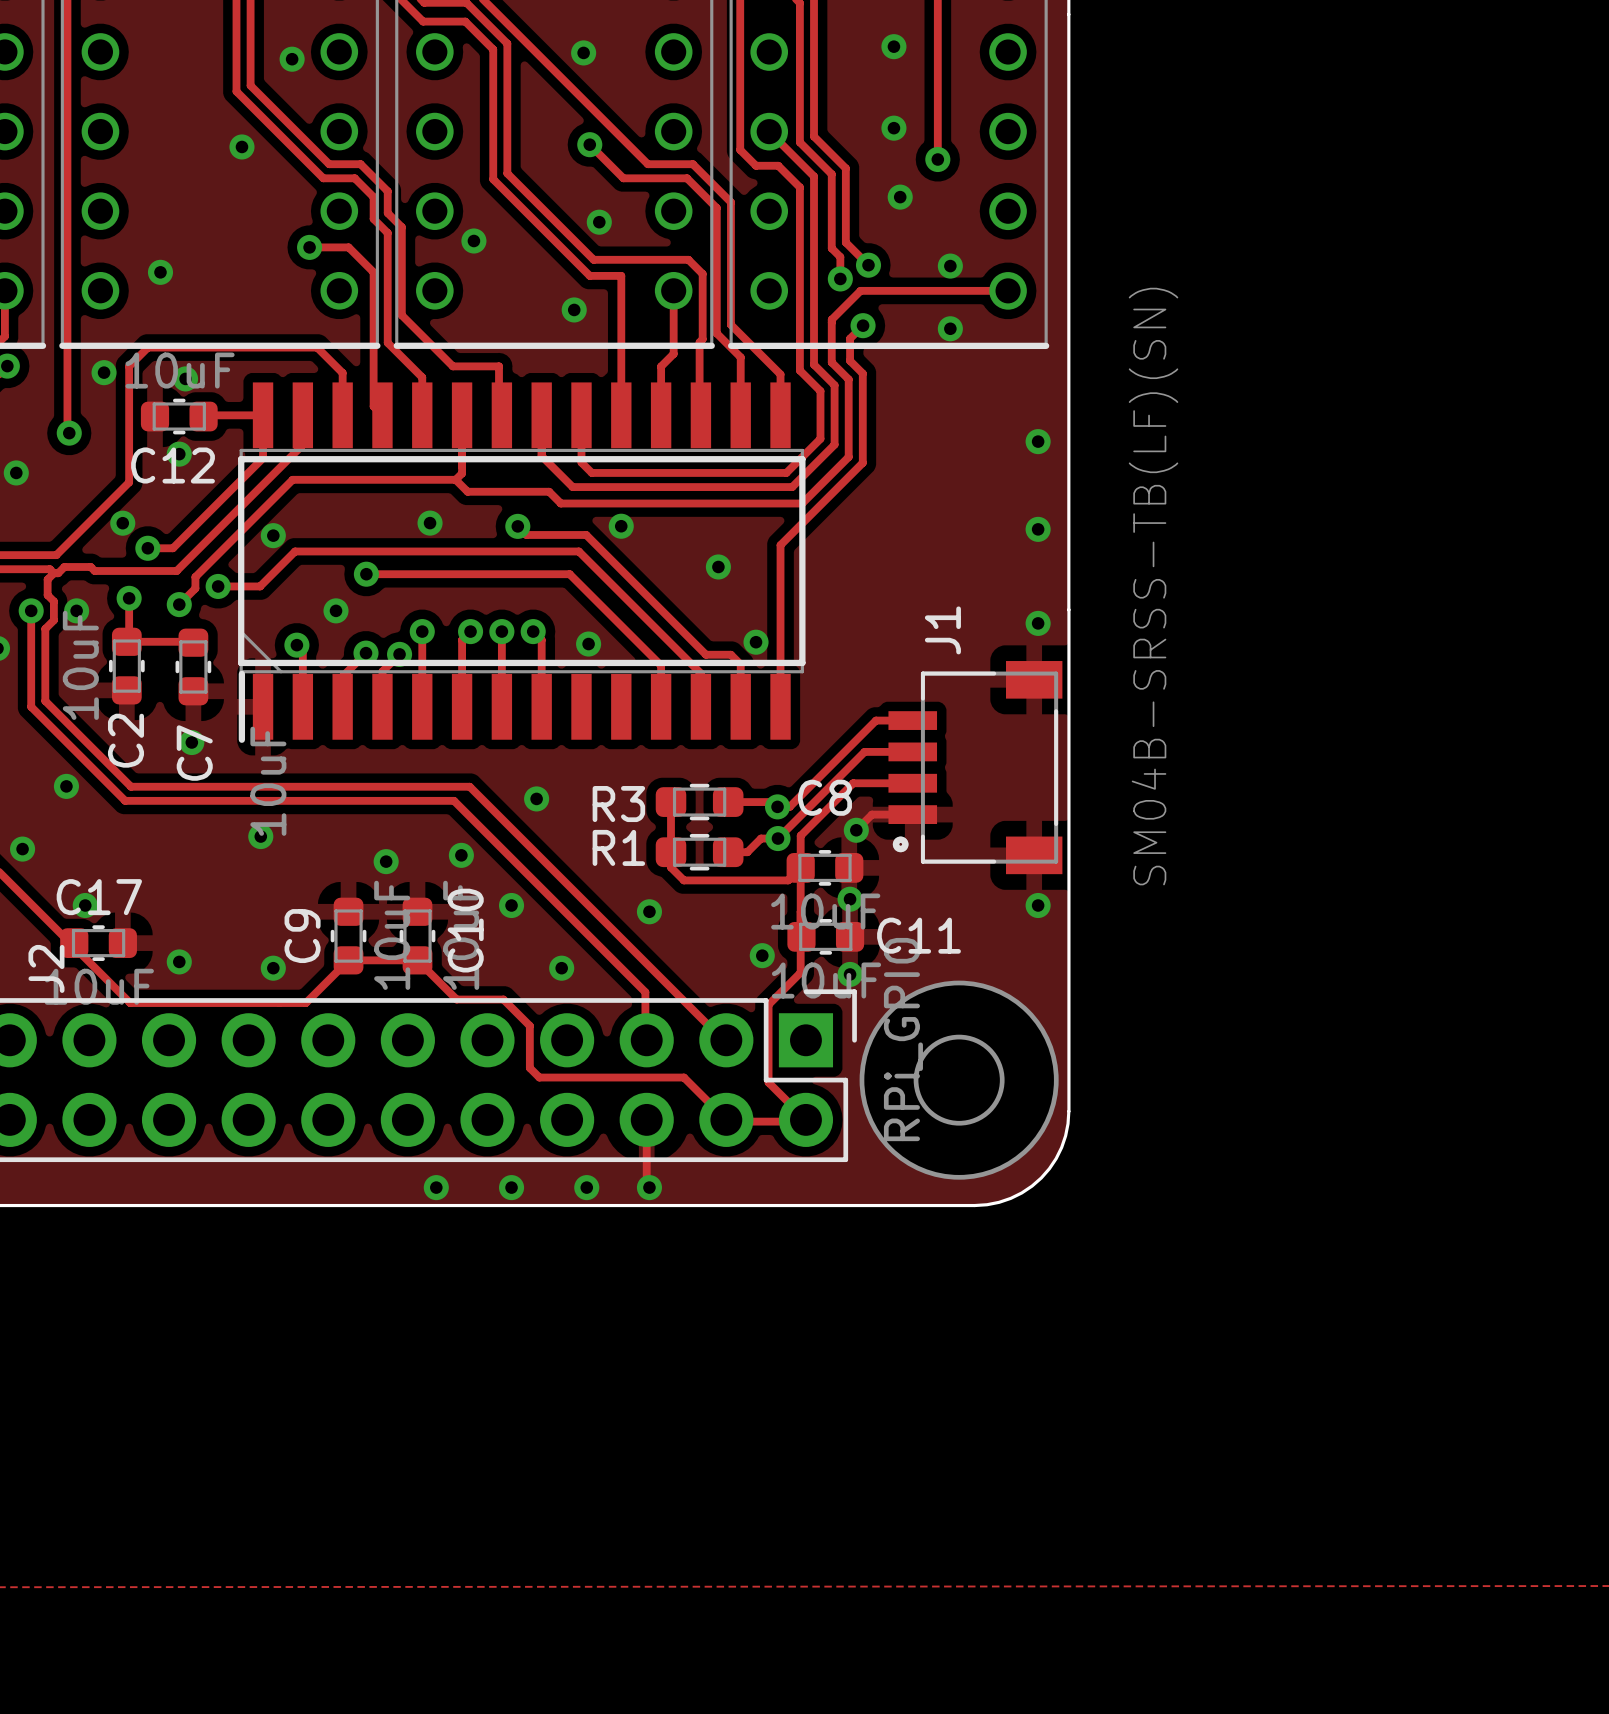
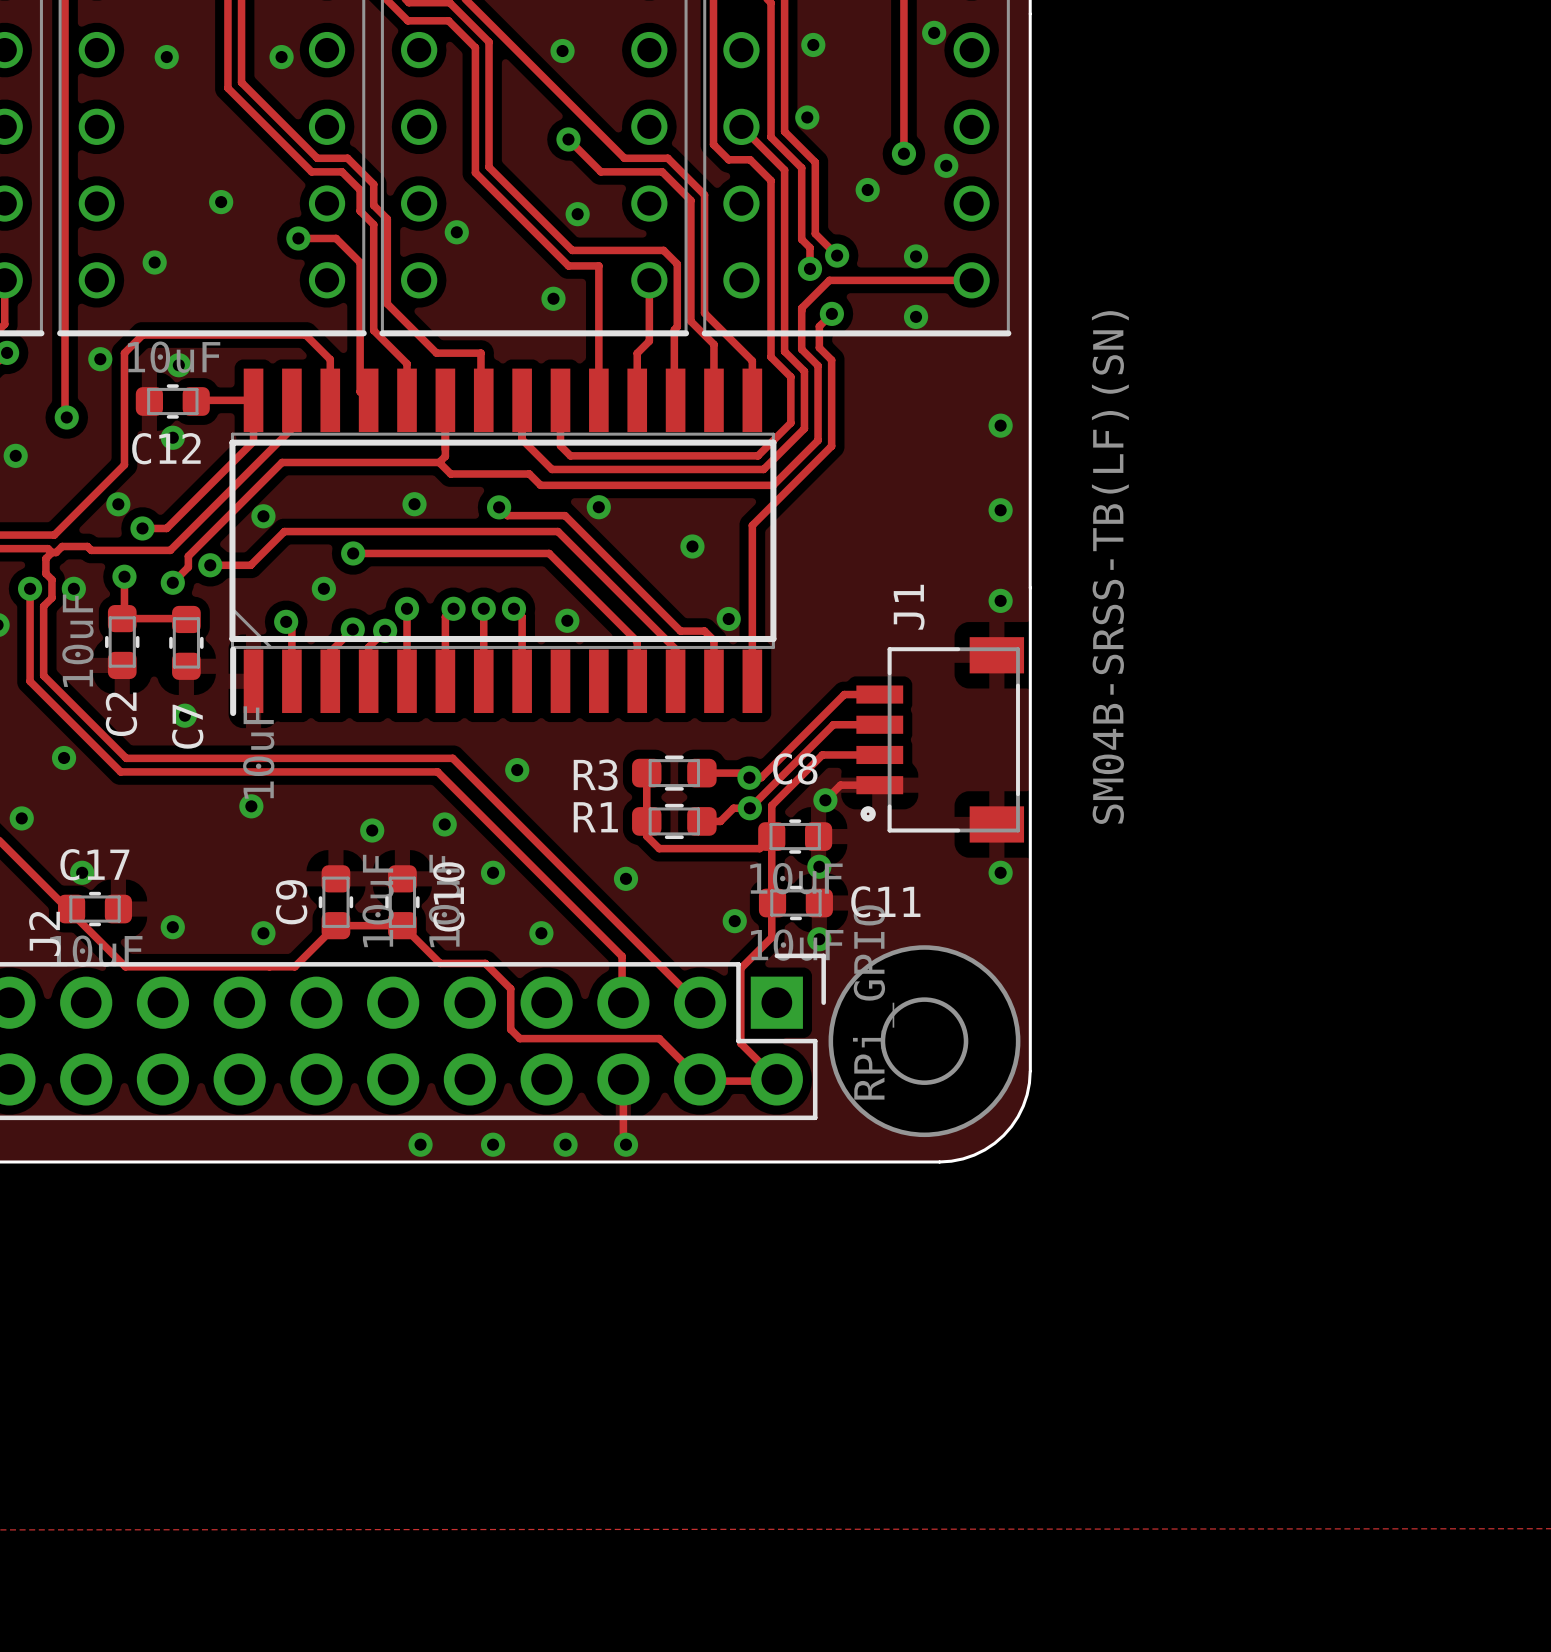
via: none -> (934, 32)
via: none -> (813, 44)
via: (893, 46) -> none
via: none -> (166, 57)
via: none -> (807, 117)
via: (893, 128) -> none
via: (241, 146) -> none
via: none -> (946, 165)
via: none -> (221, 202)

